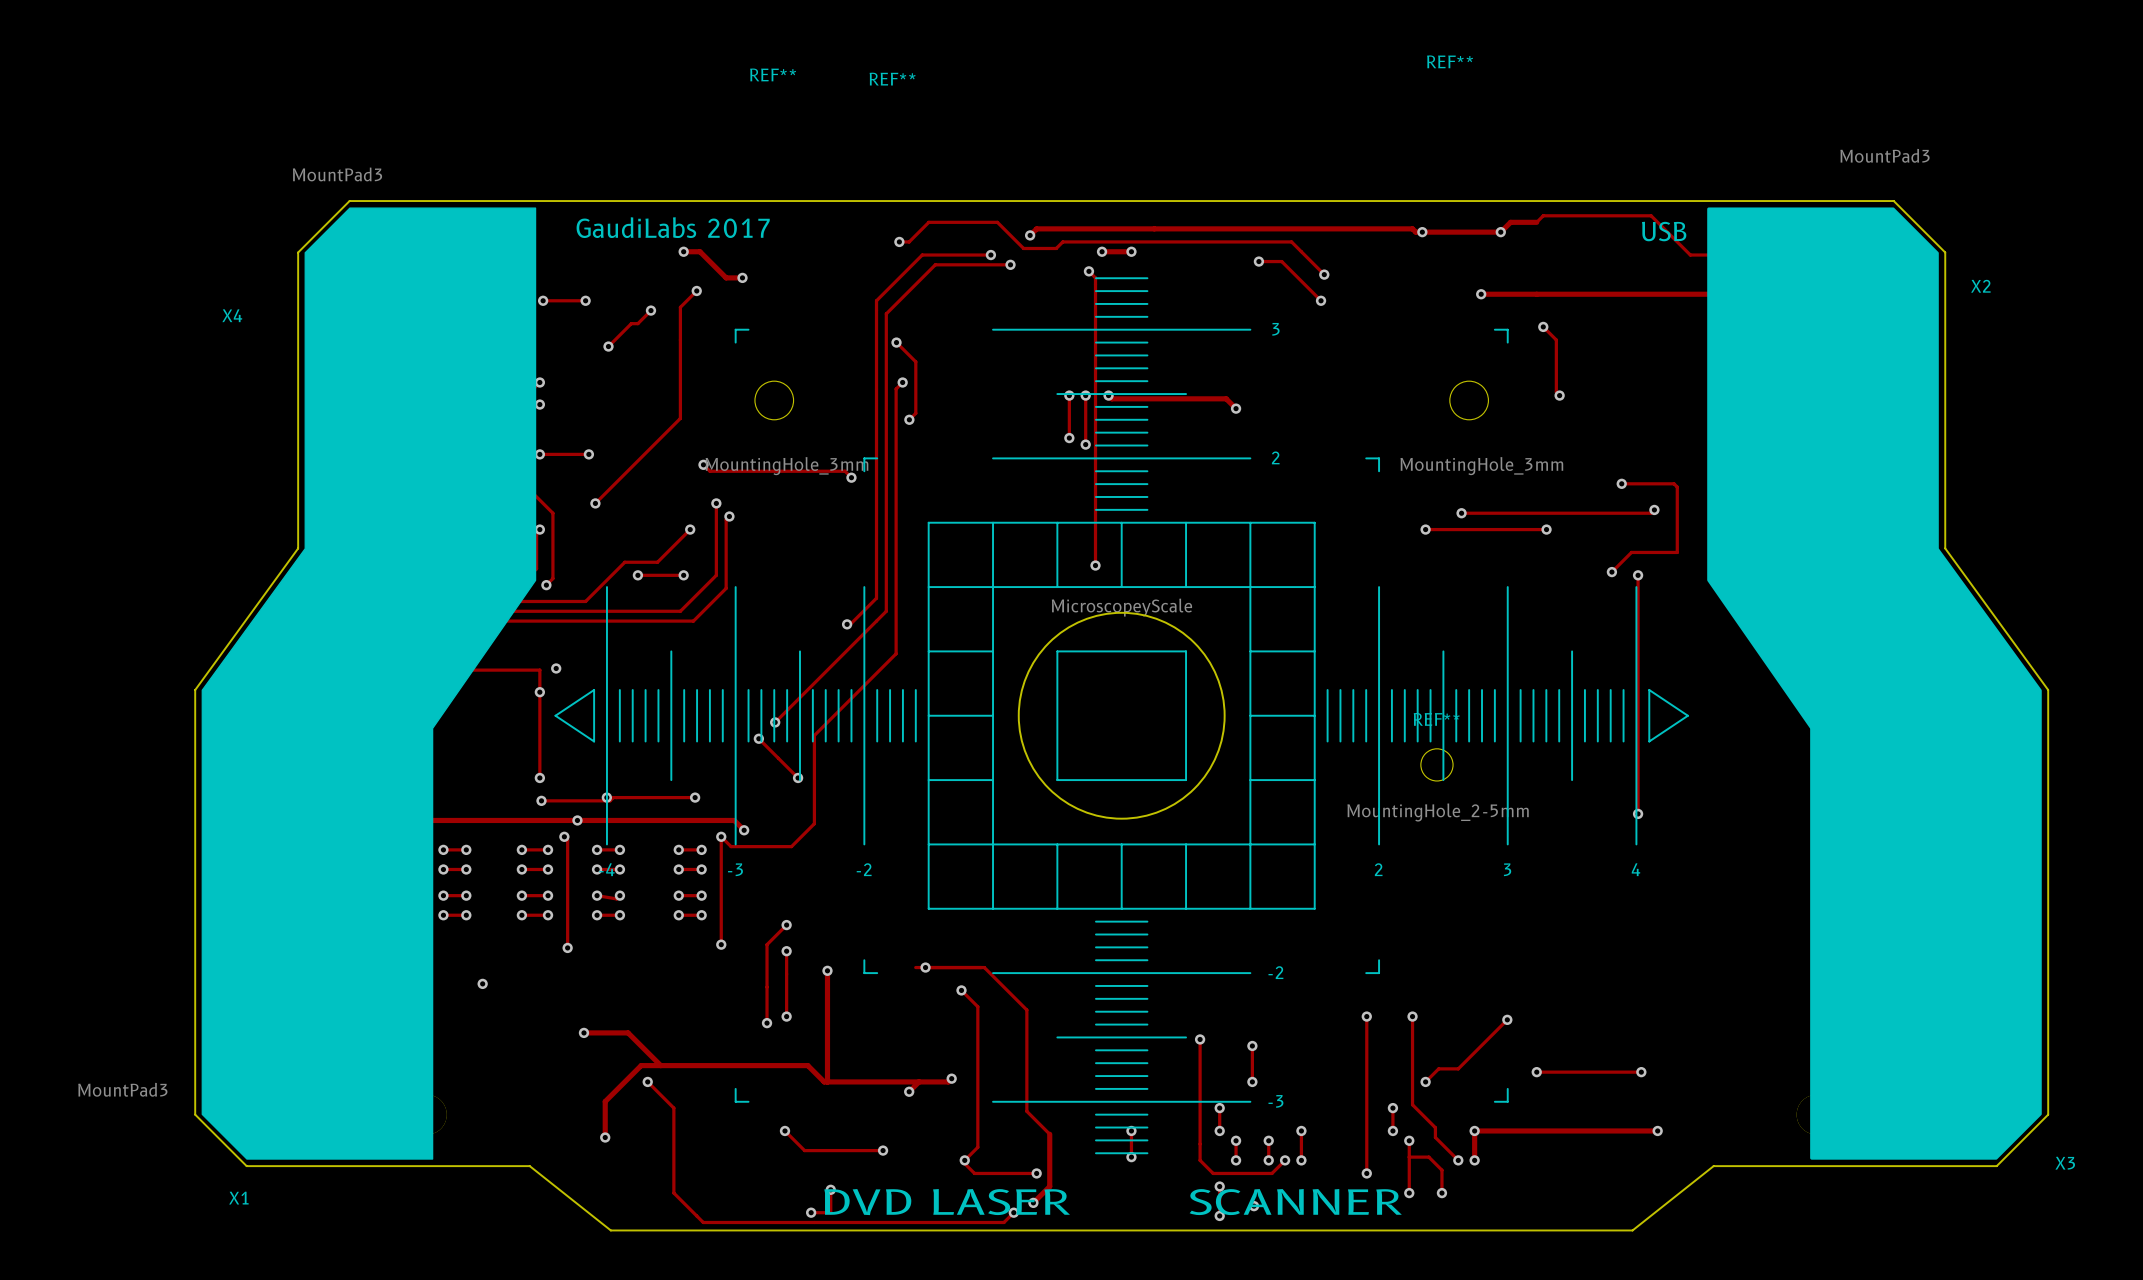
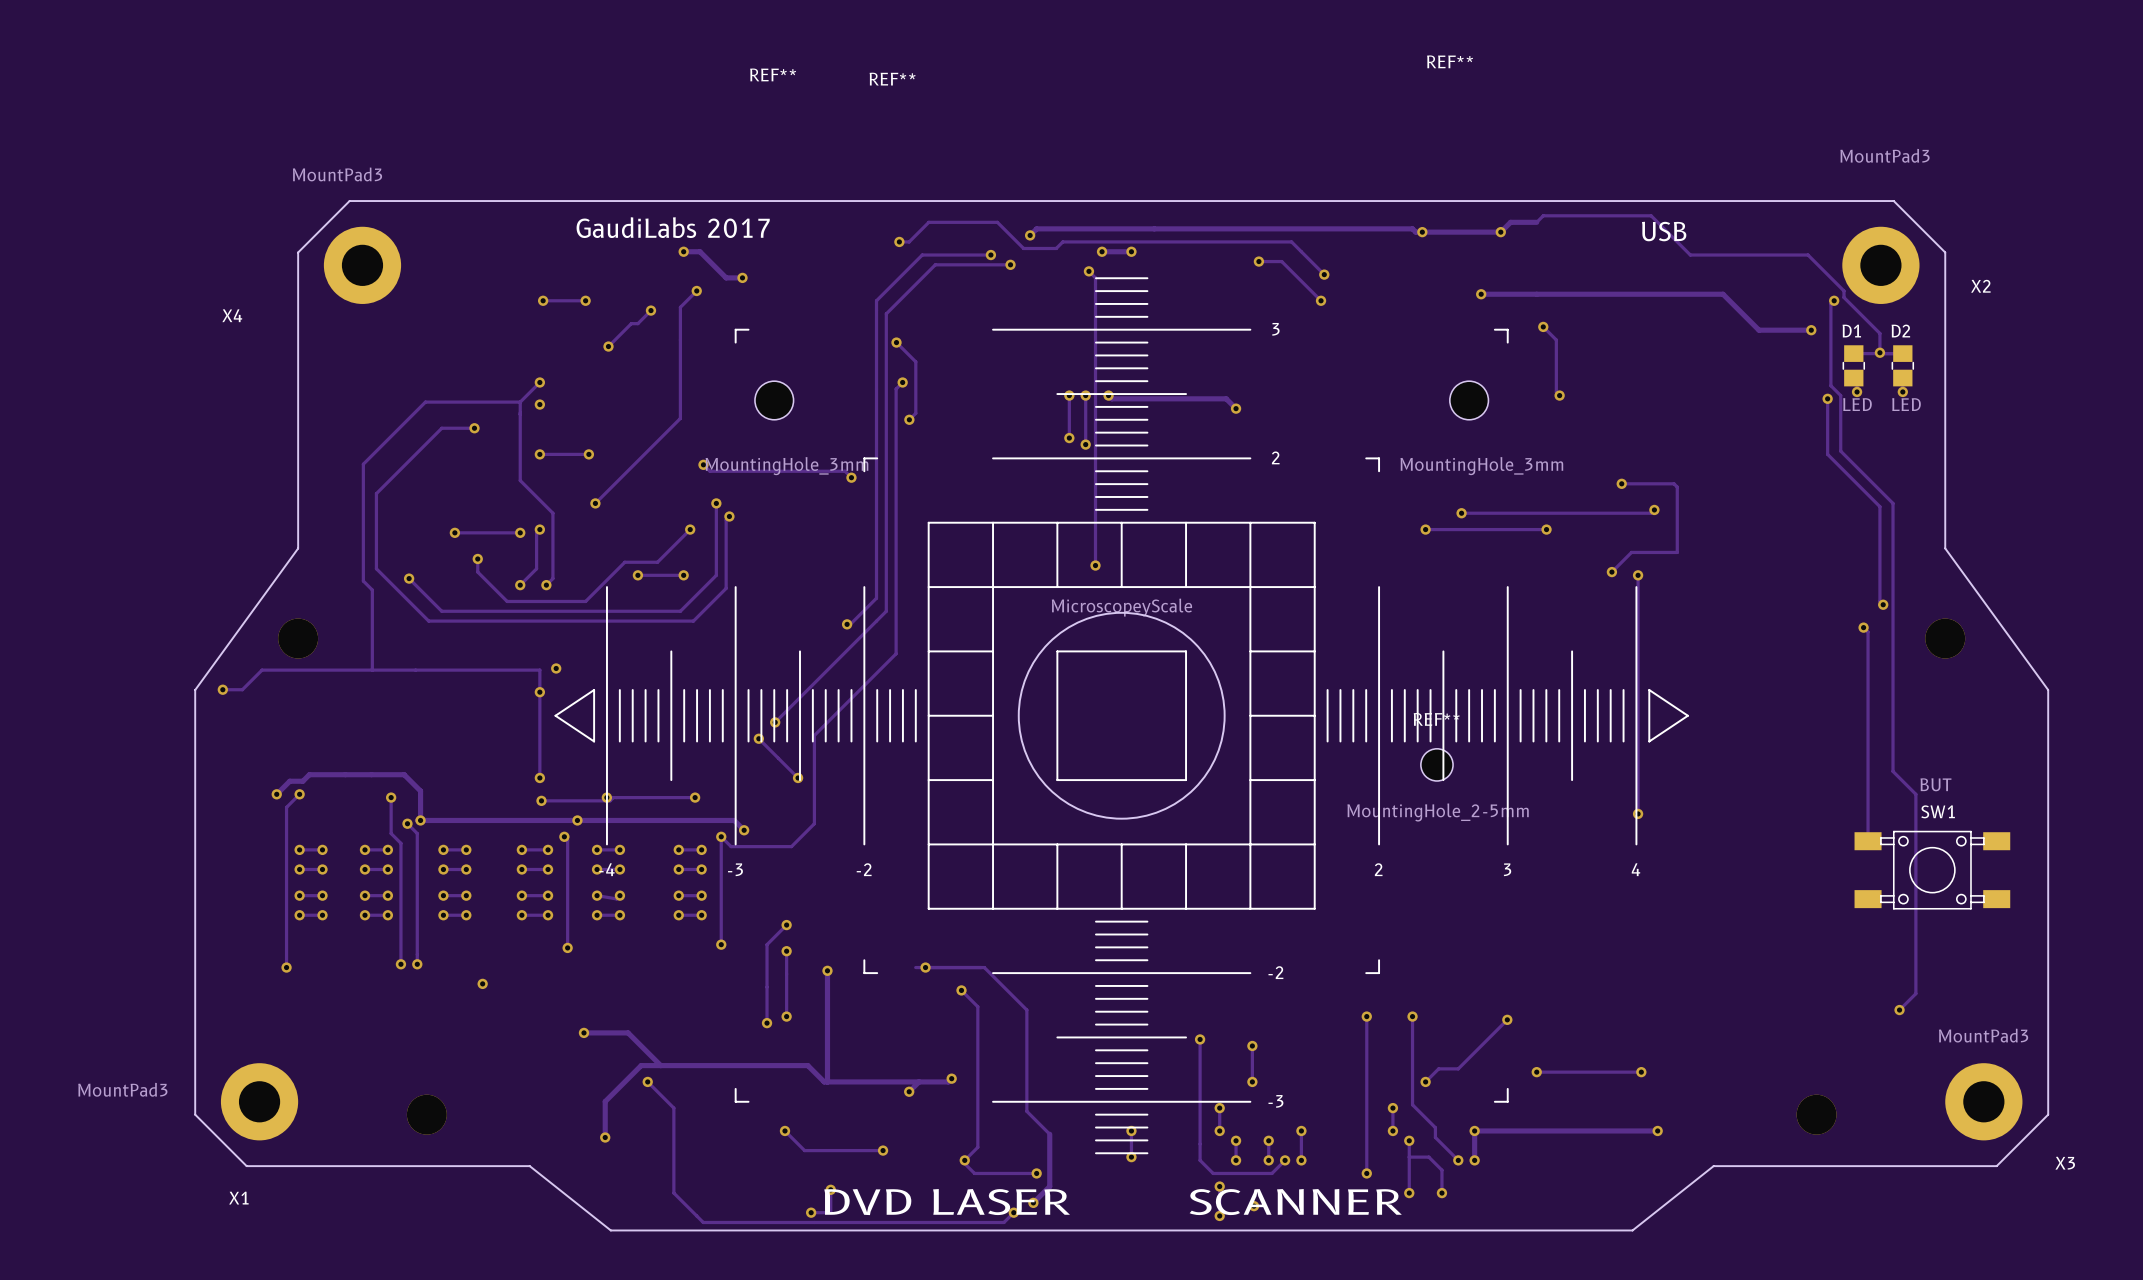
drawing: [201, 207, 537, 1160] -> none
drawing: [1707, 207, 2042, 1160] -> none

